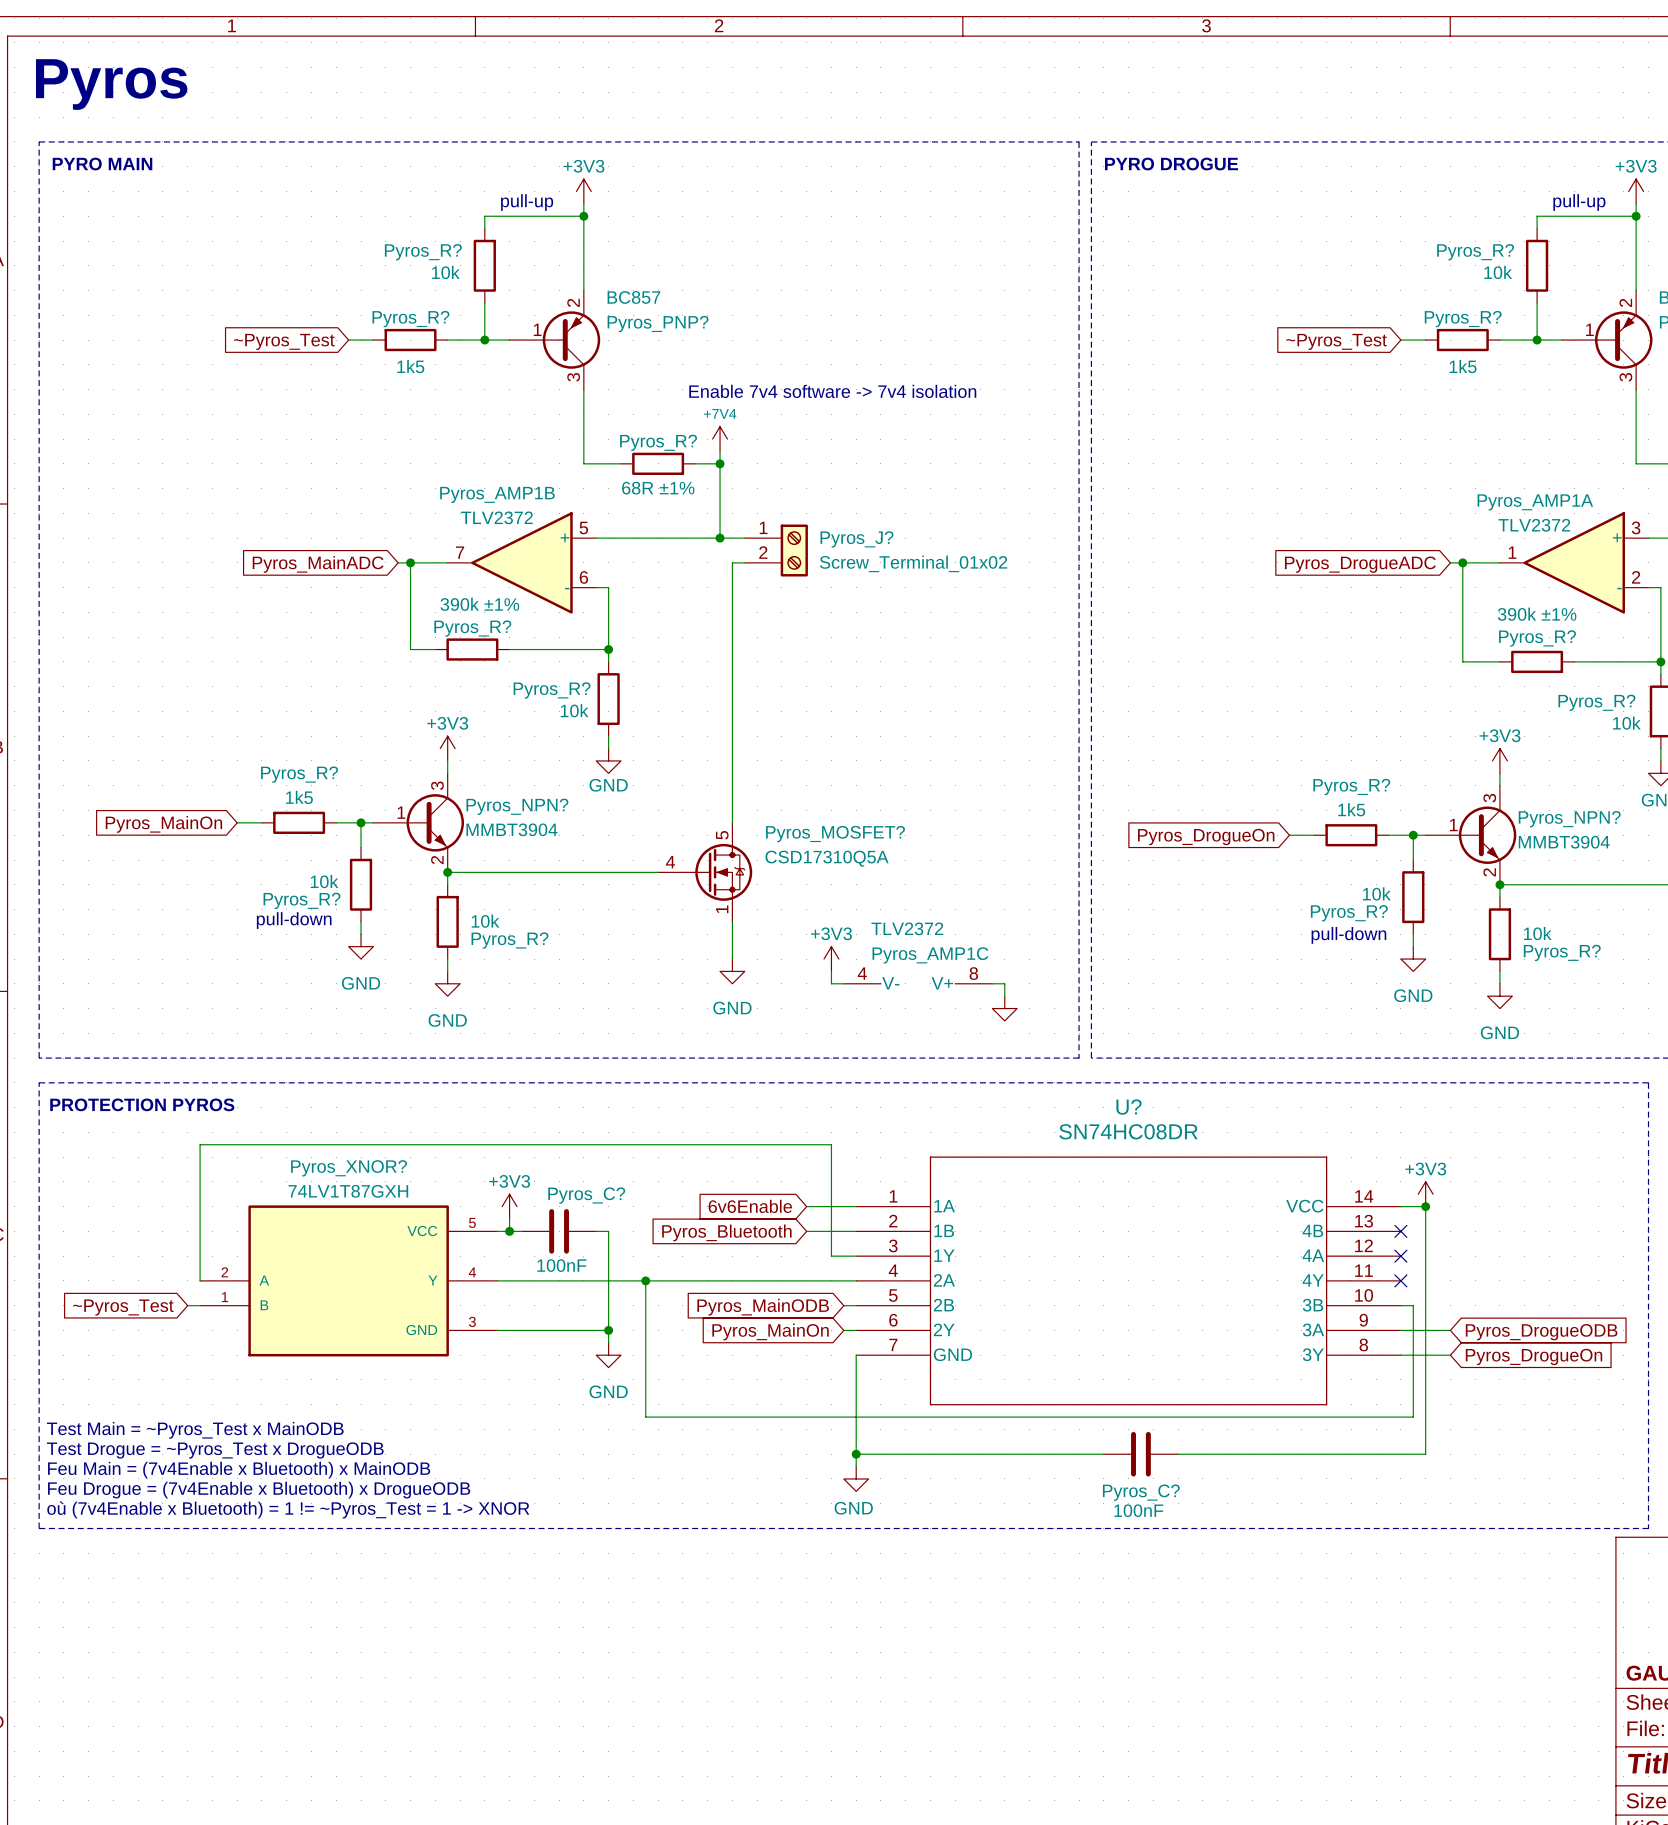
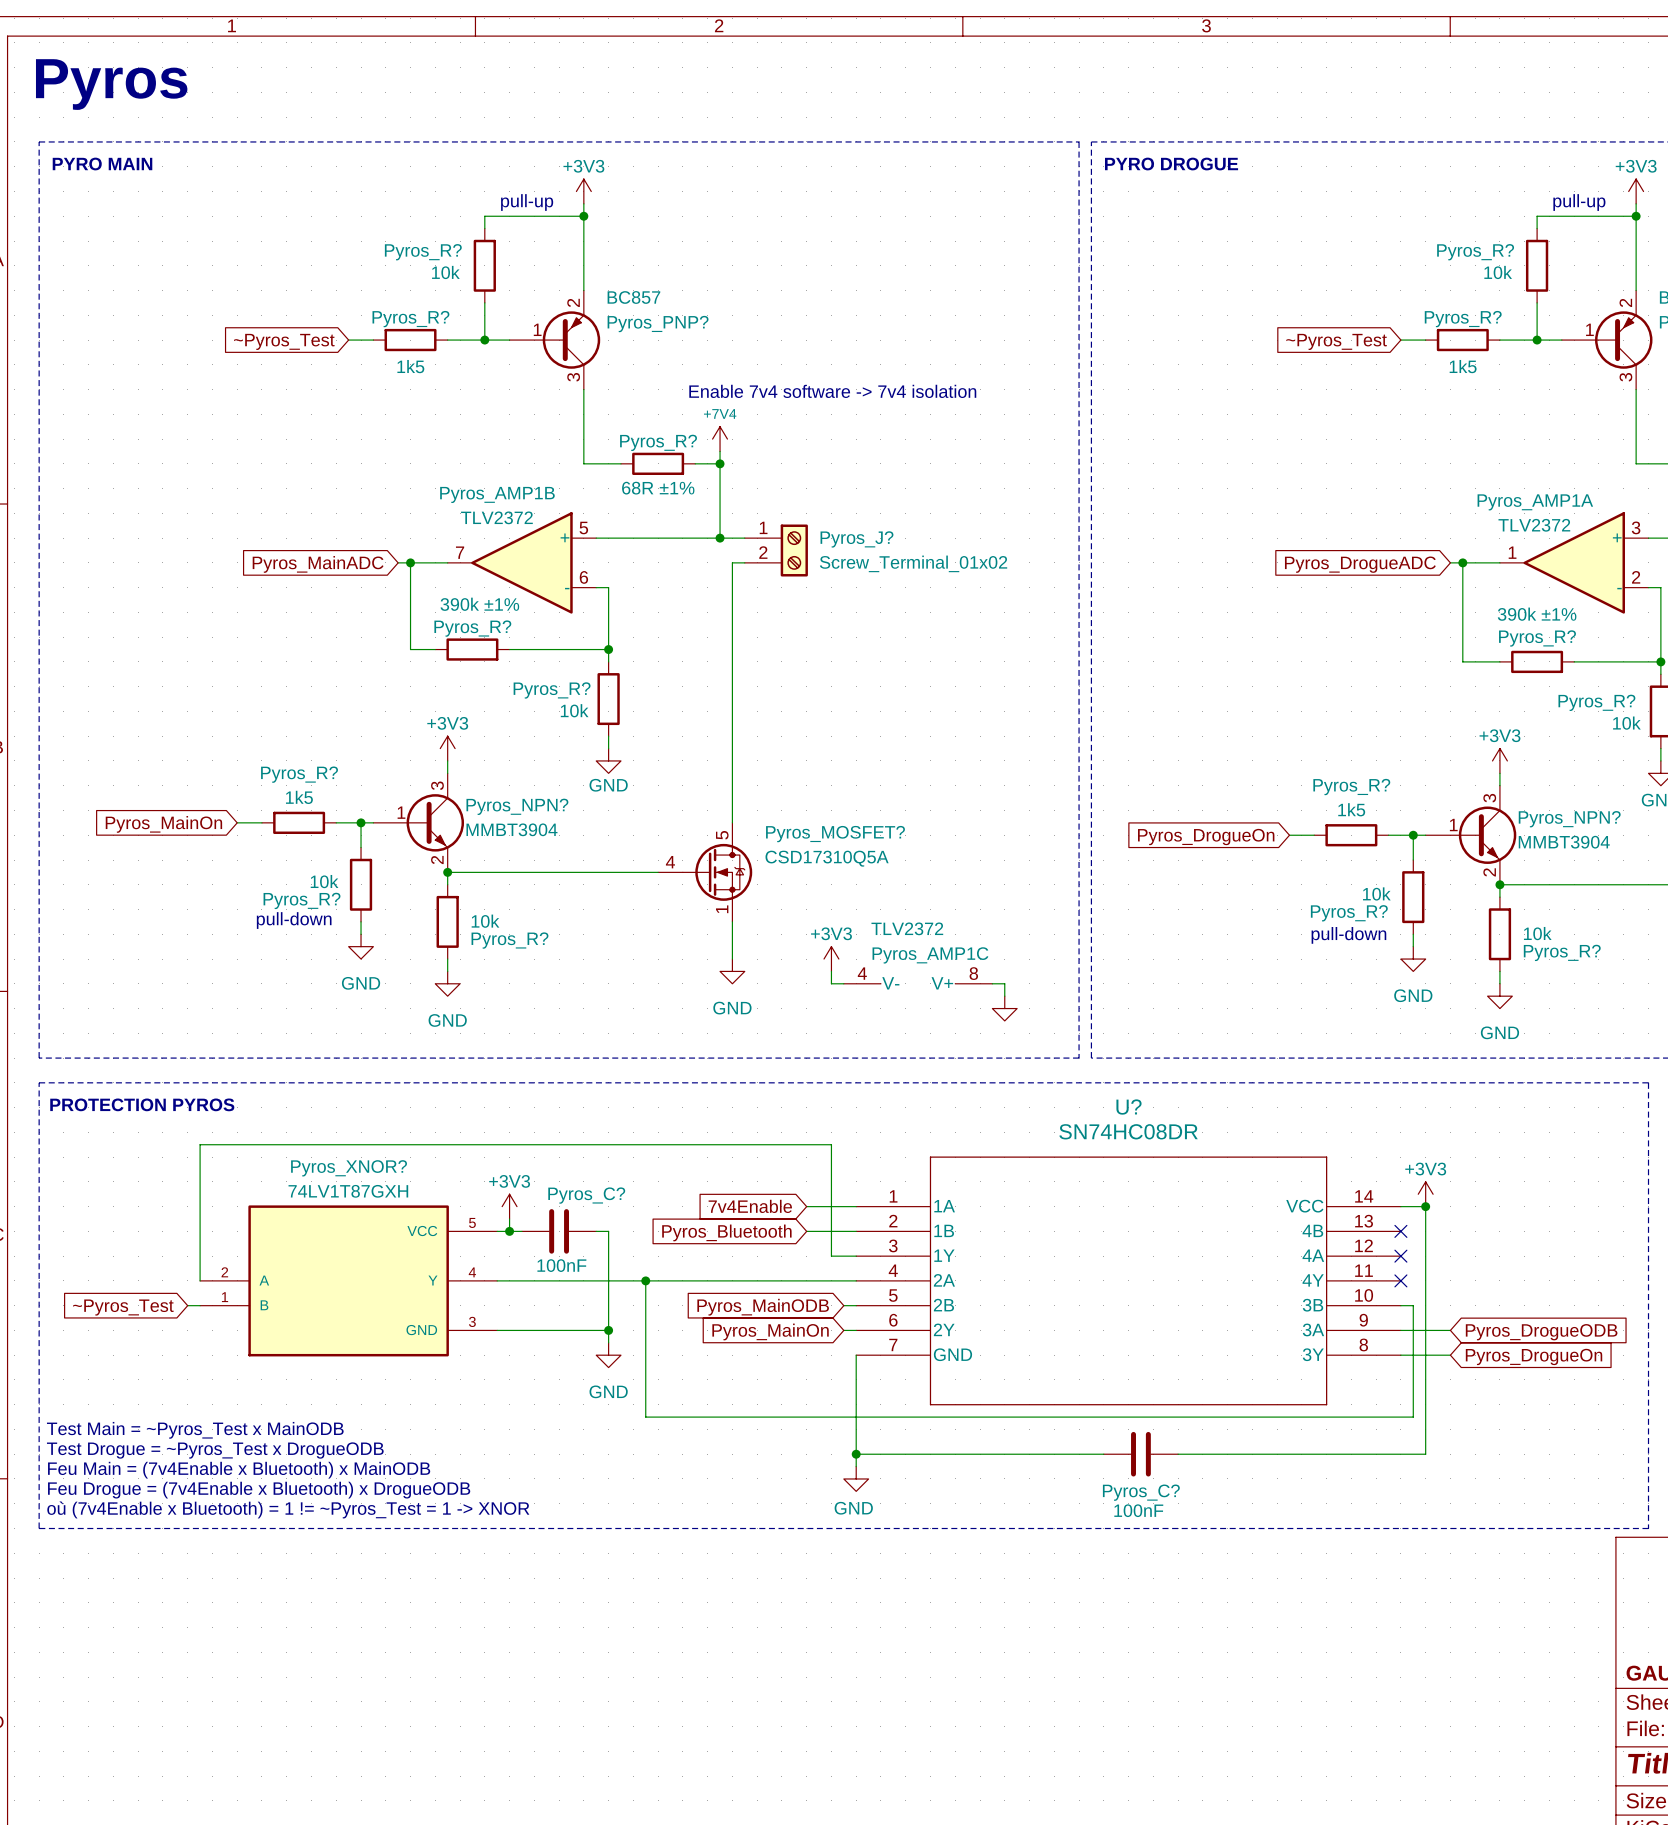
global label: 6v6Enable (750, 1206) -> 7v4Enable (750, 1206)

